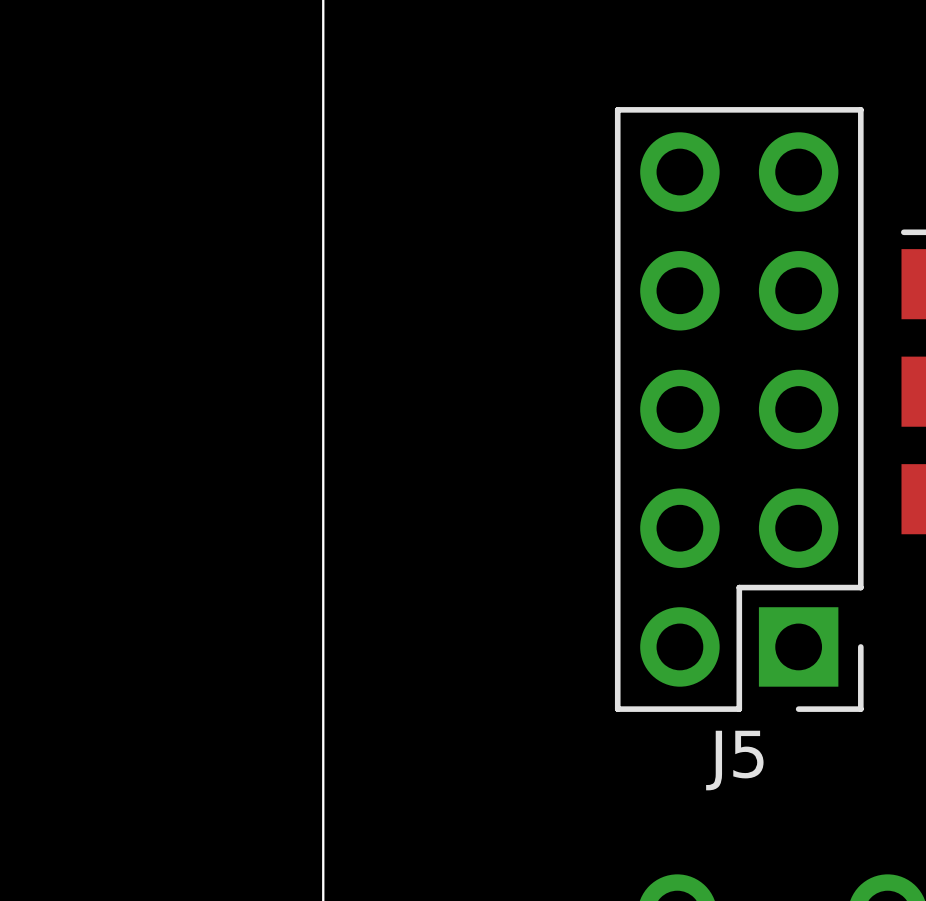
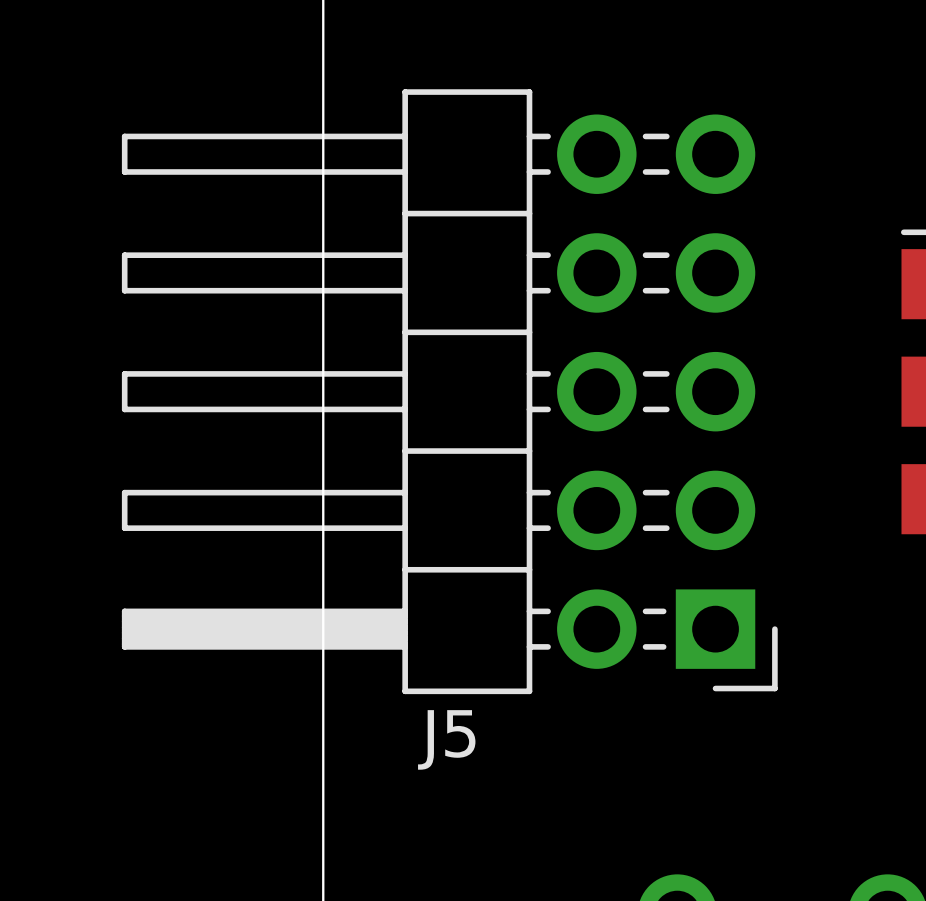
J5 footprint: [614, 107, 864, 712] -> [121, 89, 778, 695]

